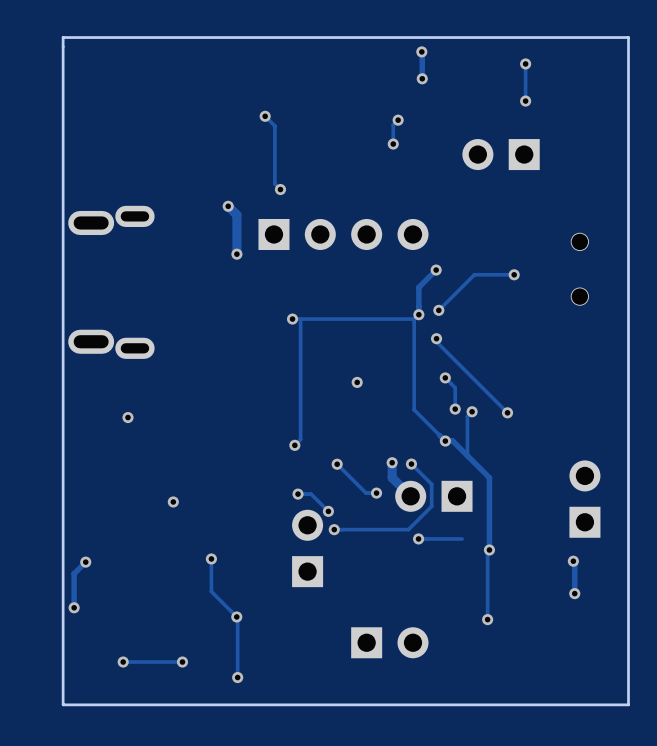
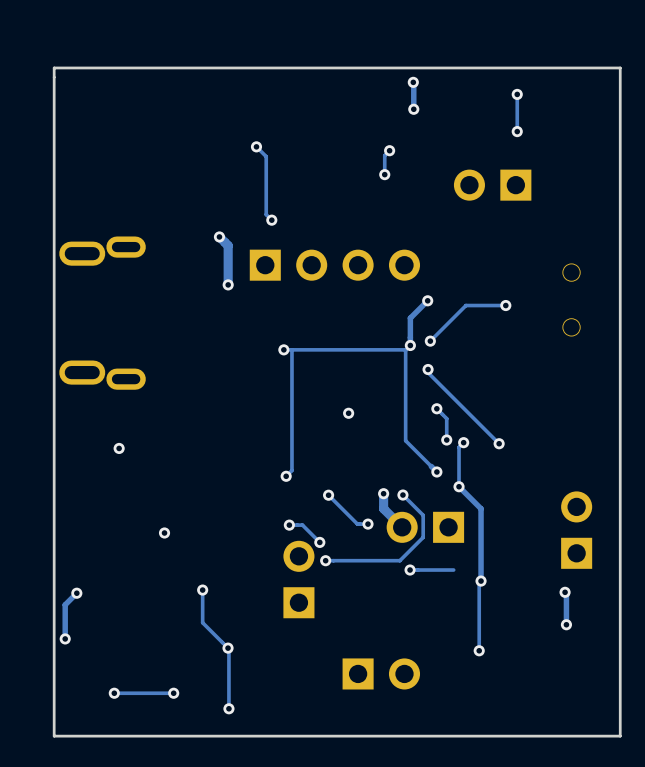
track: (445, 441) (452, 441) (467, 455) -> none
via: none -> (459, 486)

